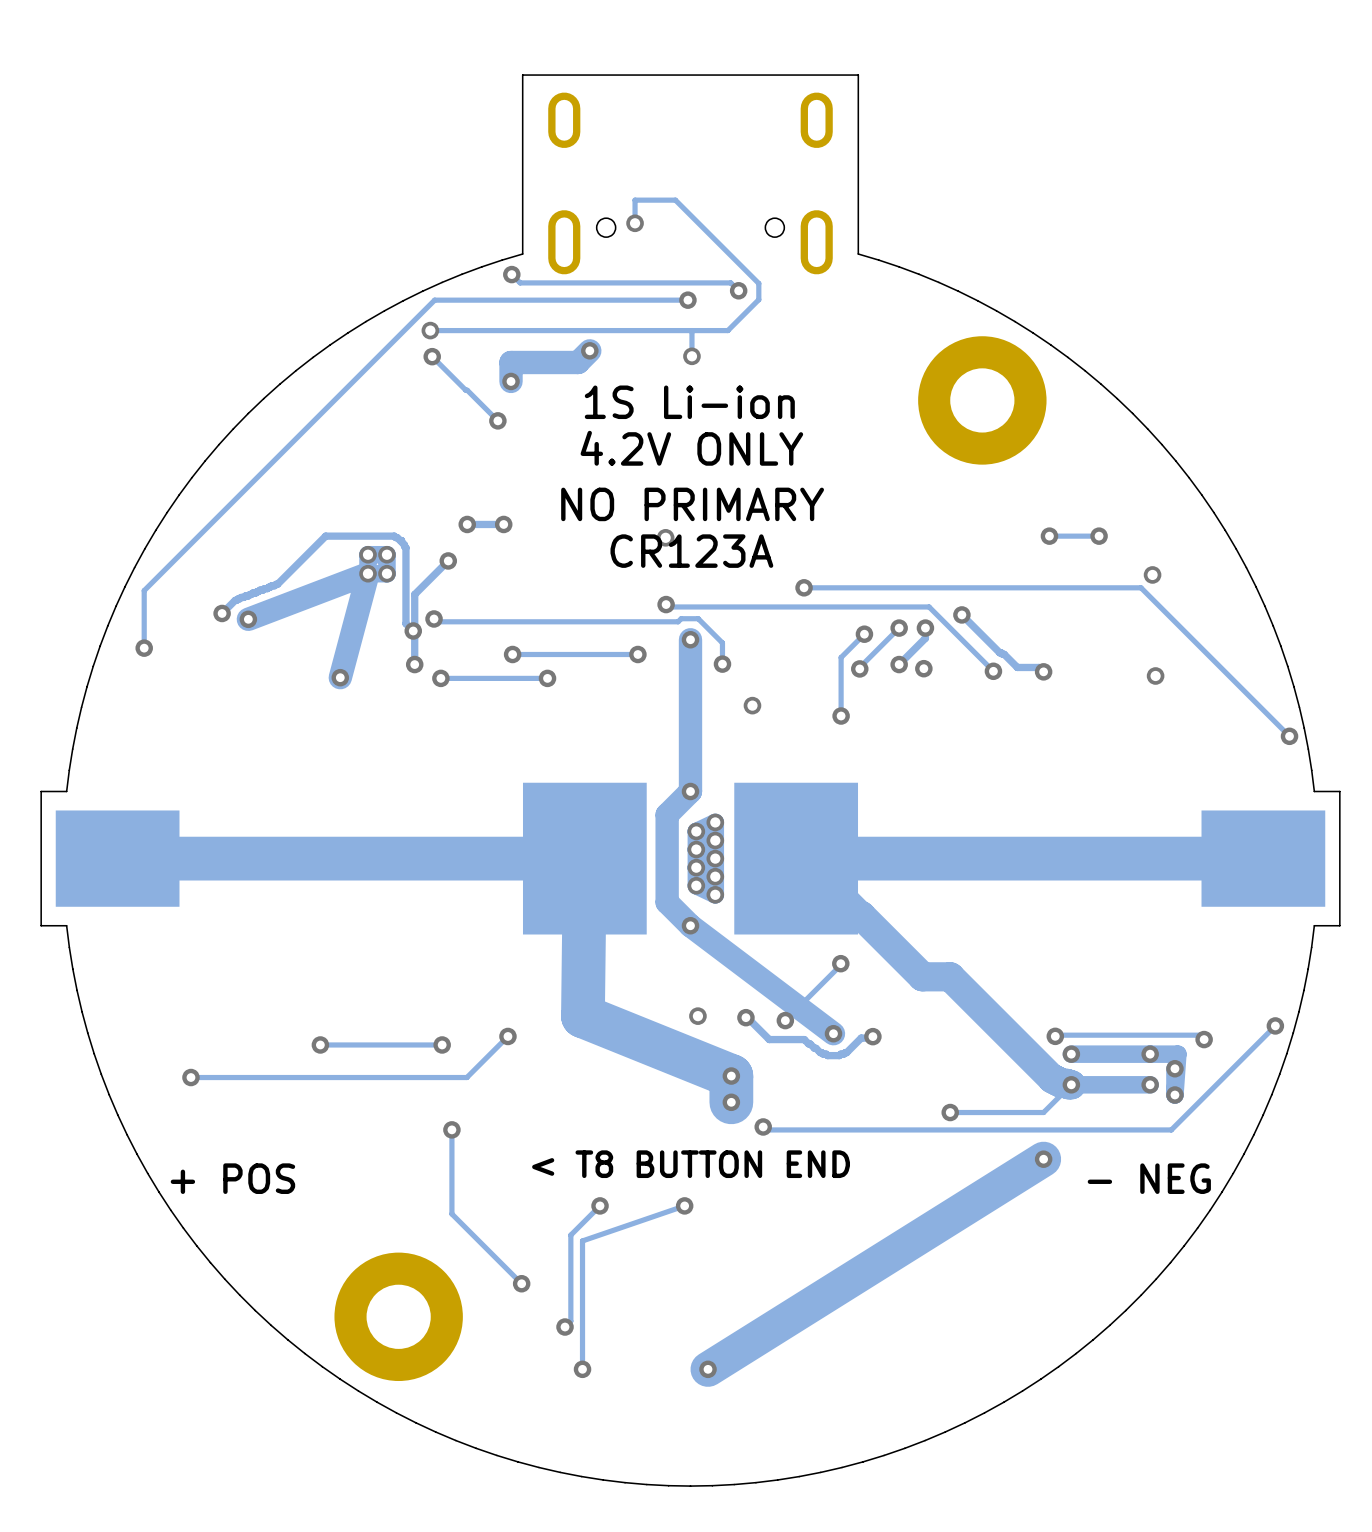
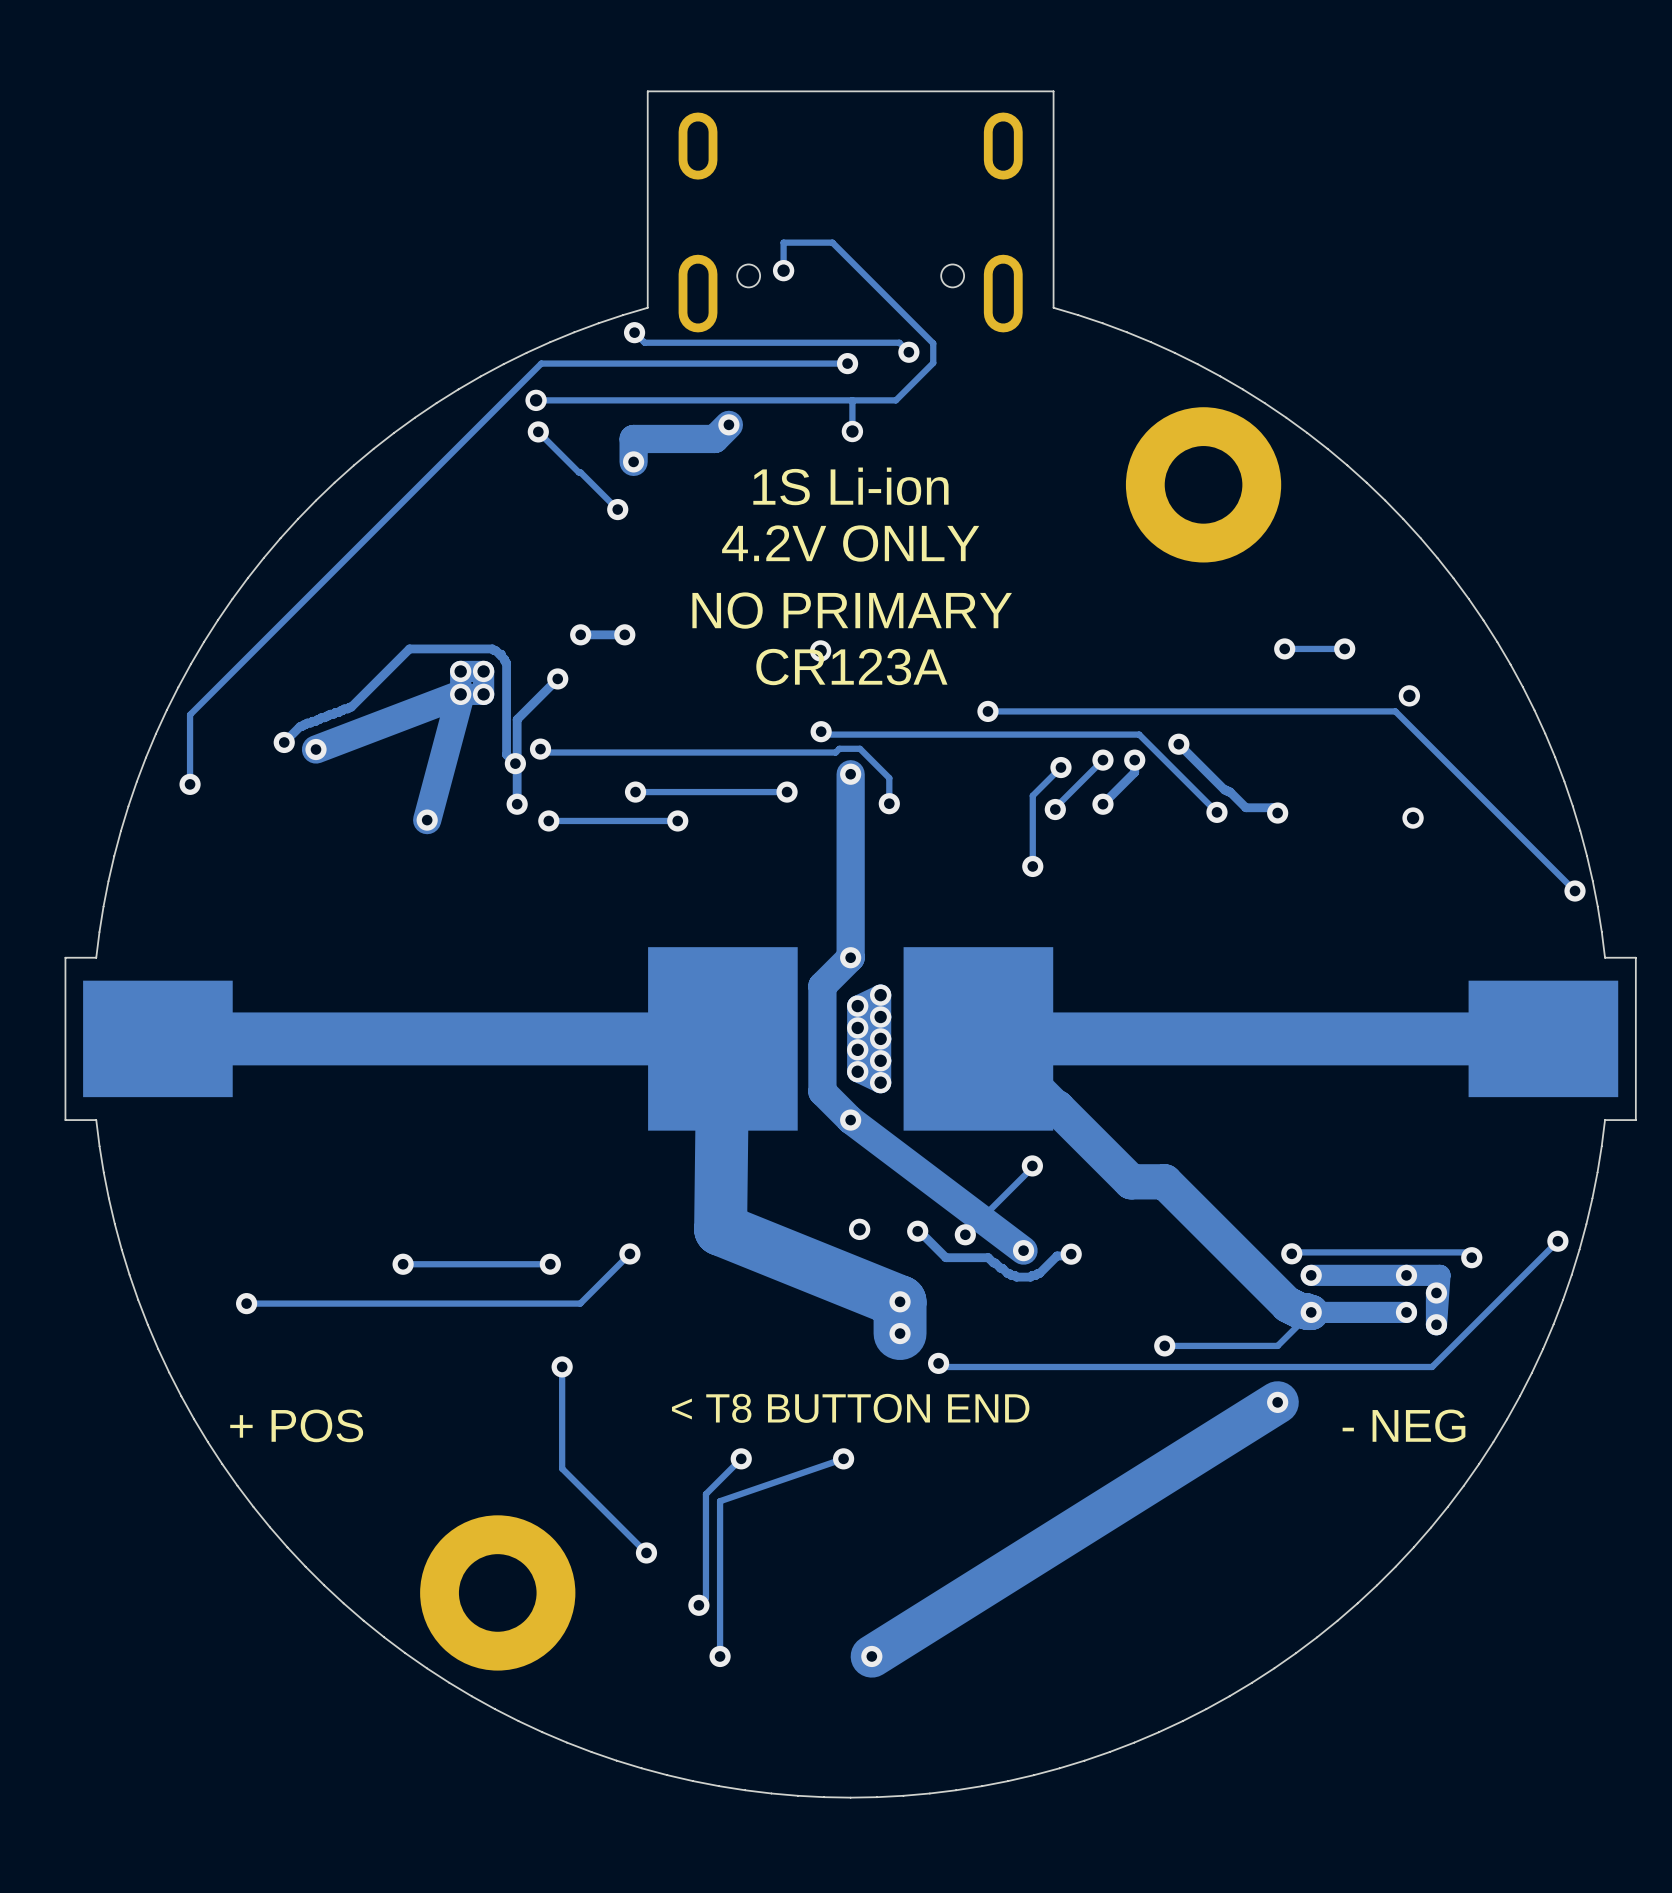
via: (923, 668) -> none
via: (752, 705) -> none

